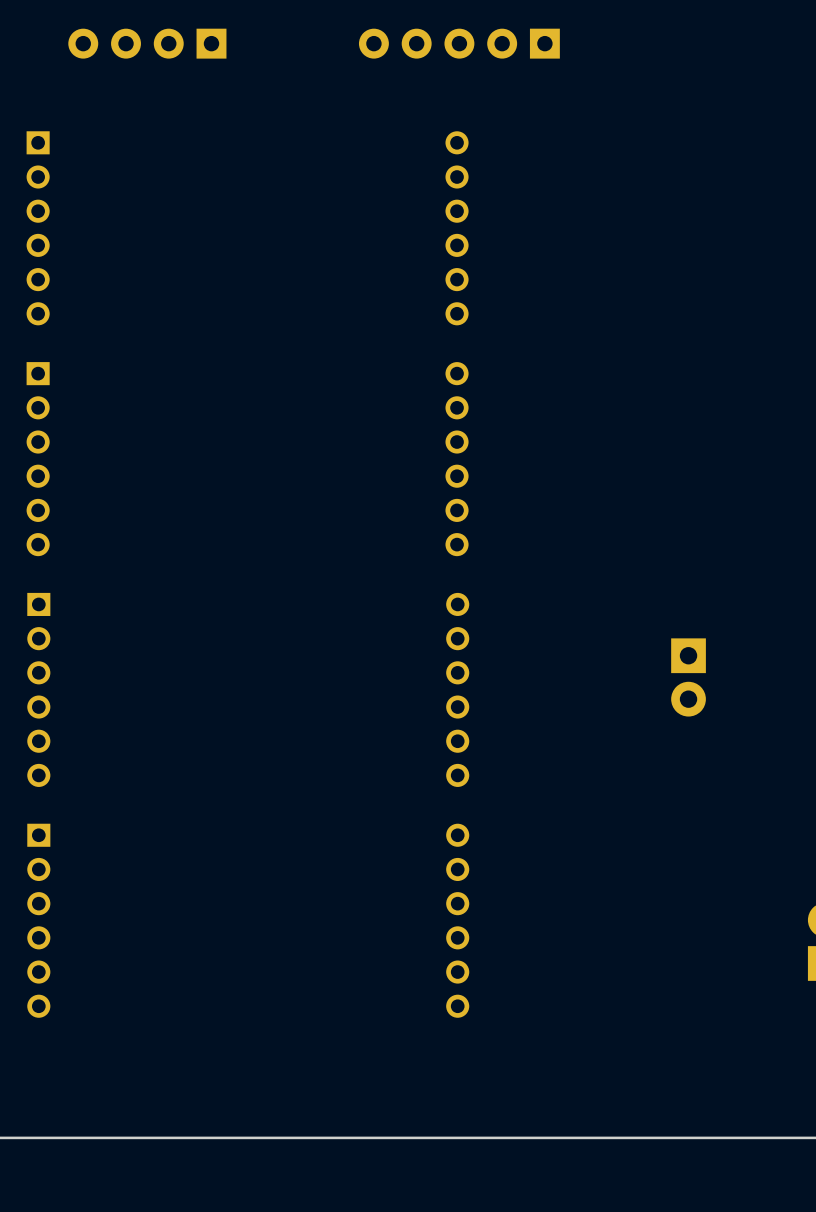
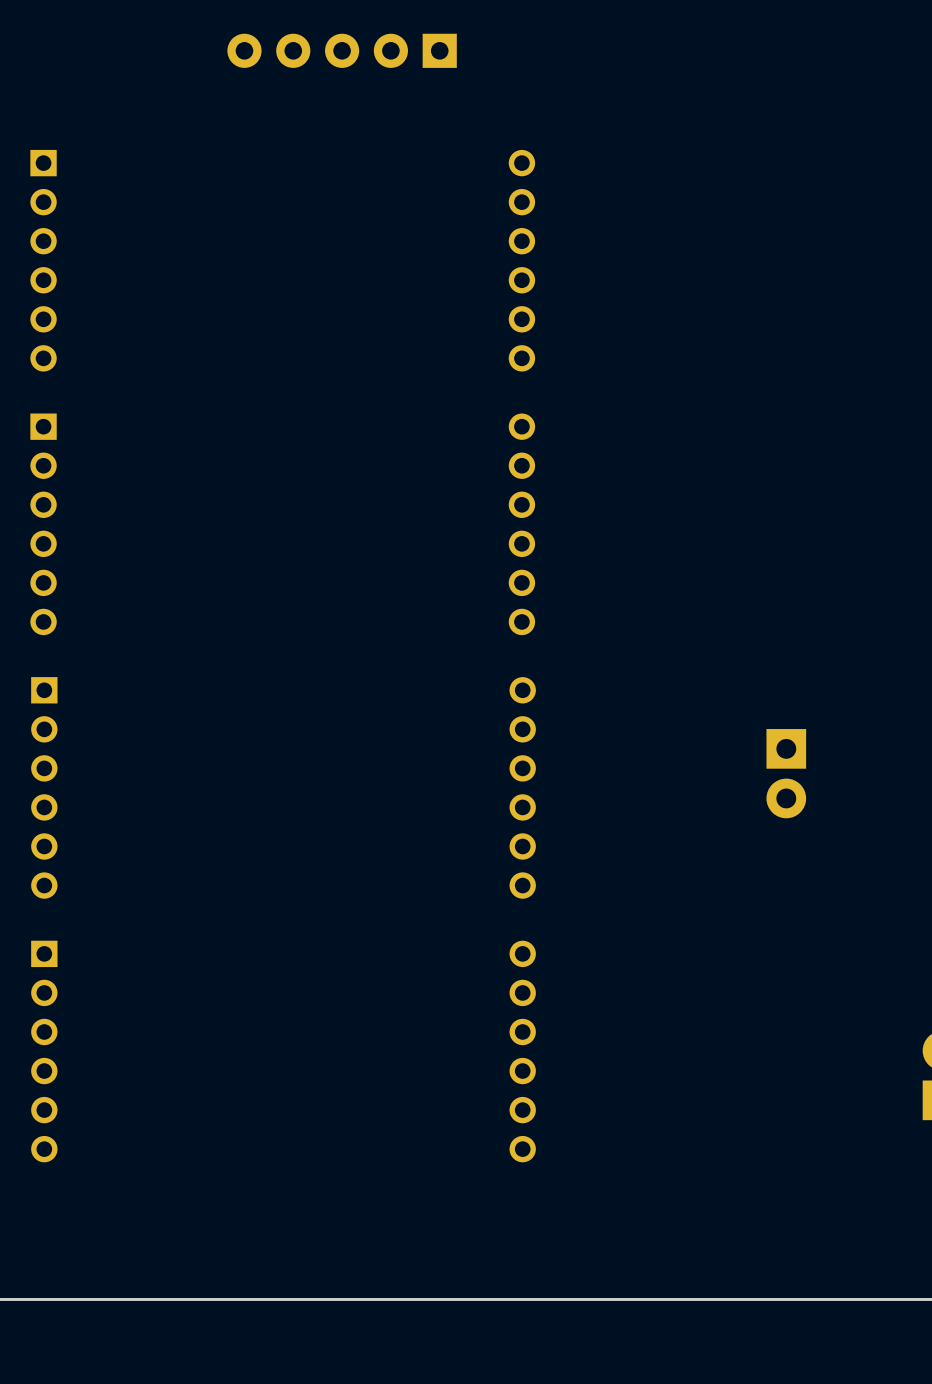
part: (147, 43) -> none
part position: (459, 43) -> (342, 50)

